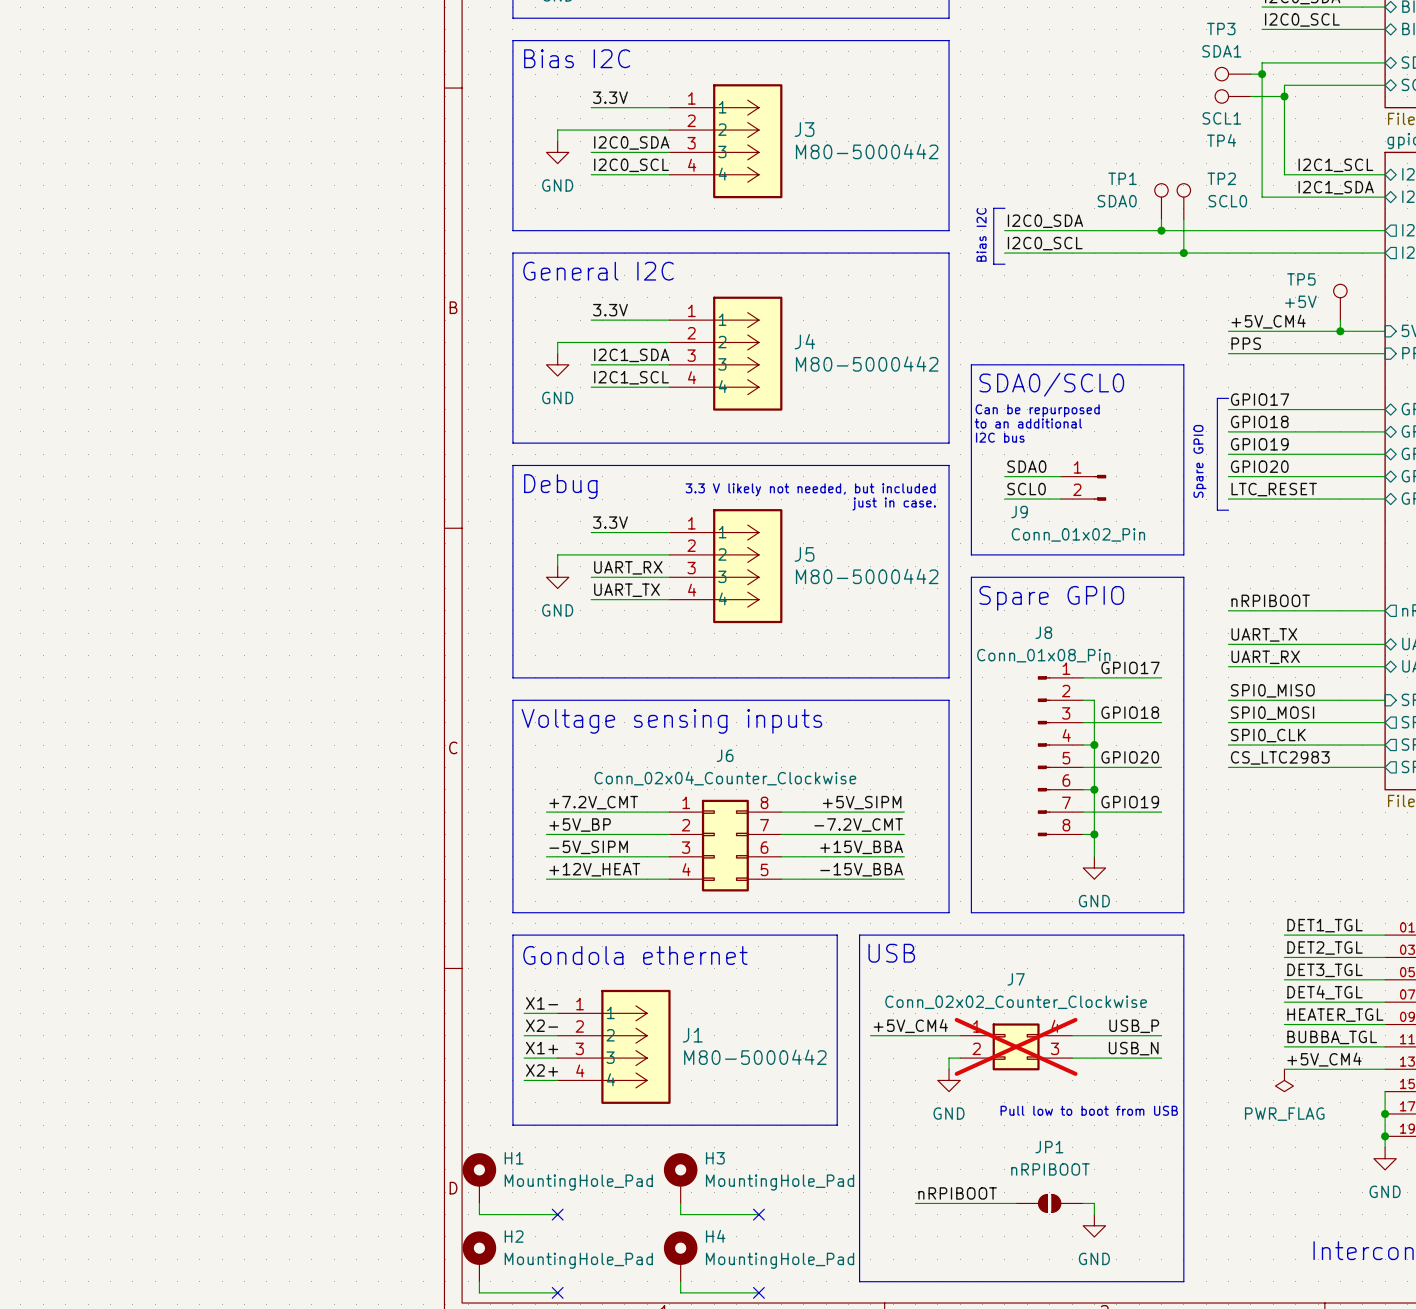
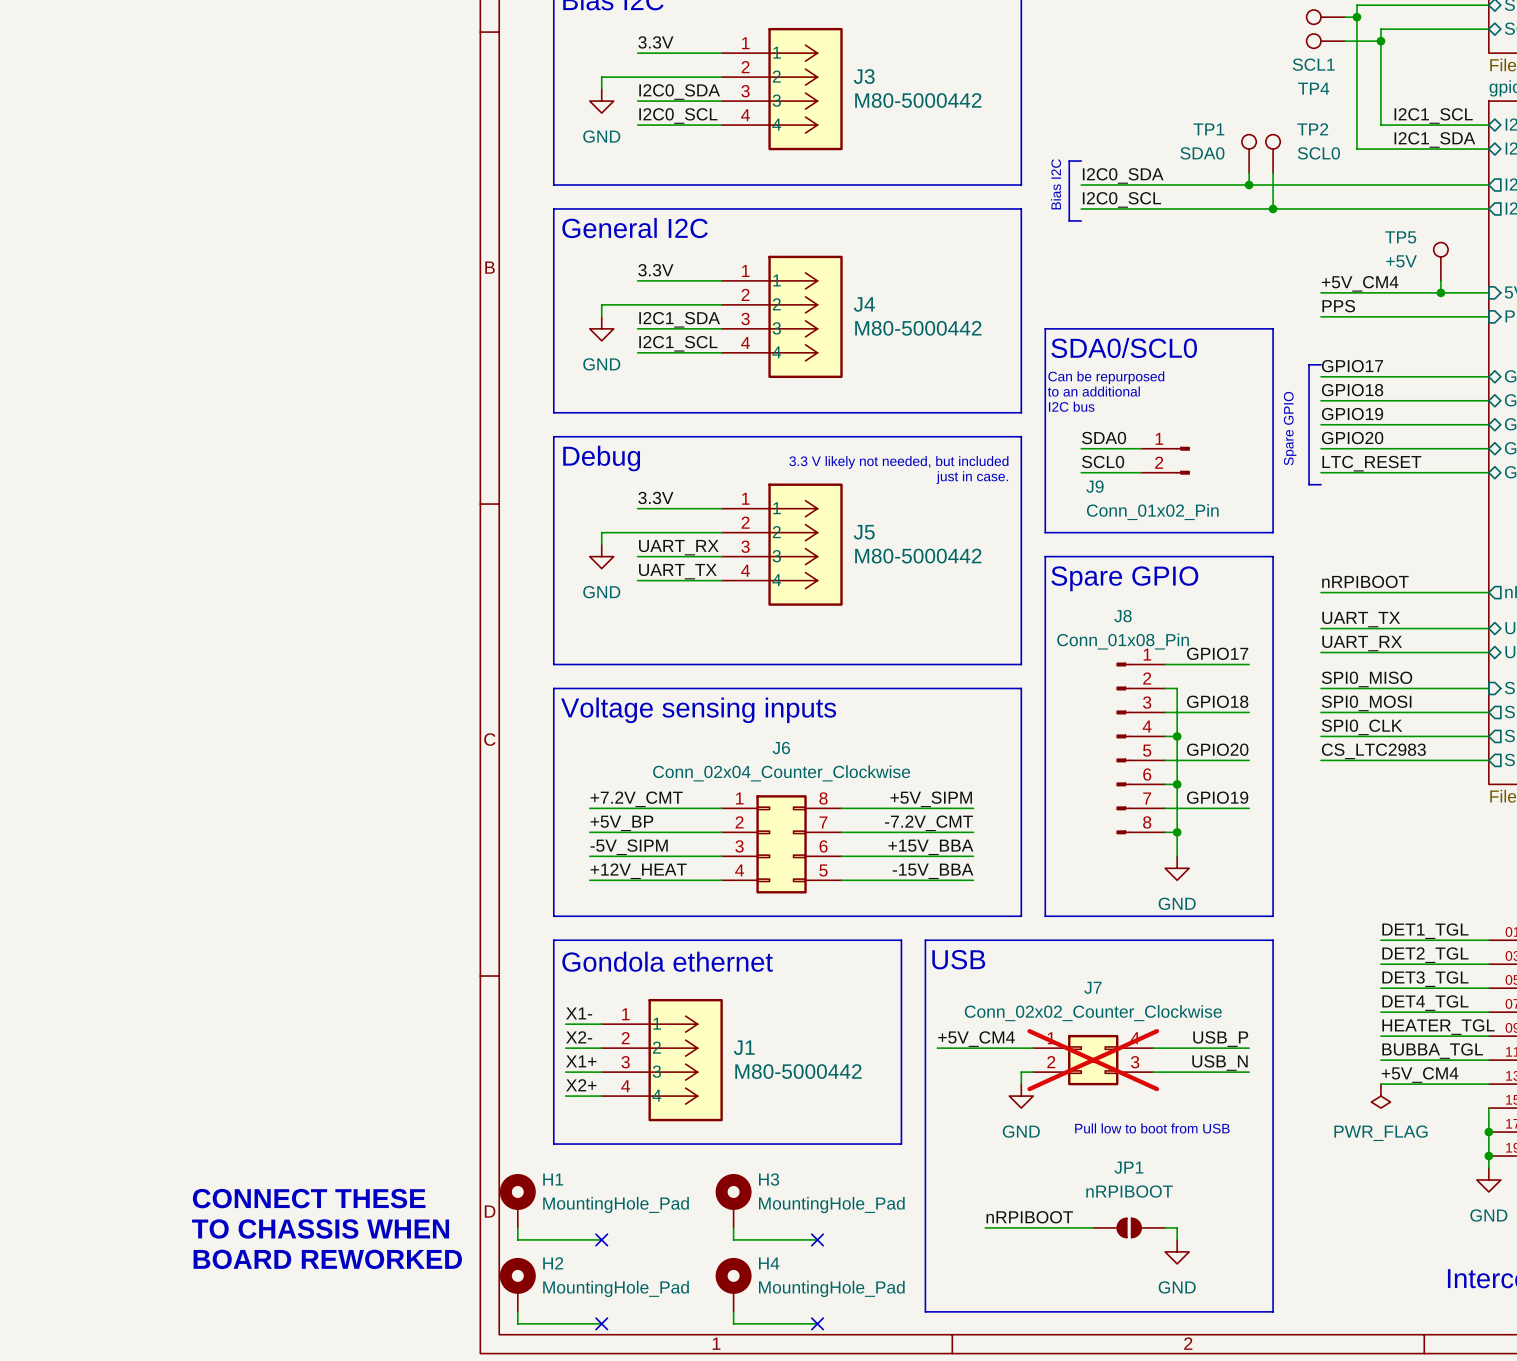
text: none -> CONNECT THESE (309, 1198)
text: none -> TO CHASSIS WHEN (320, 1228)
text: none -> BOARD REWORKED (327, 1259)

